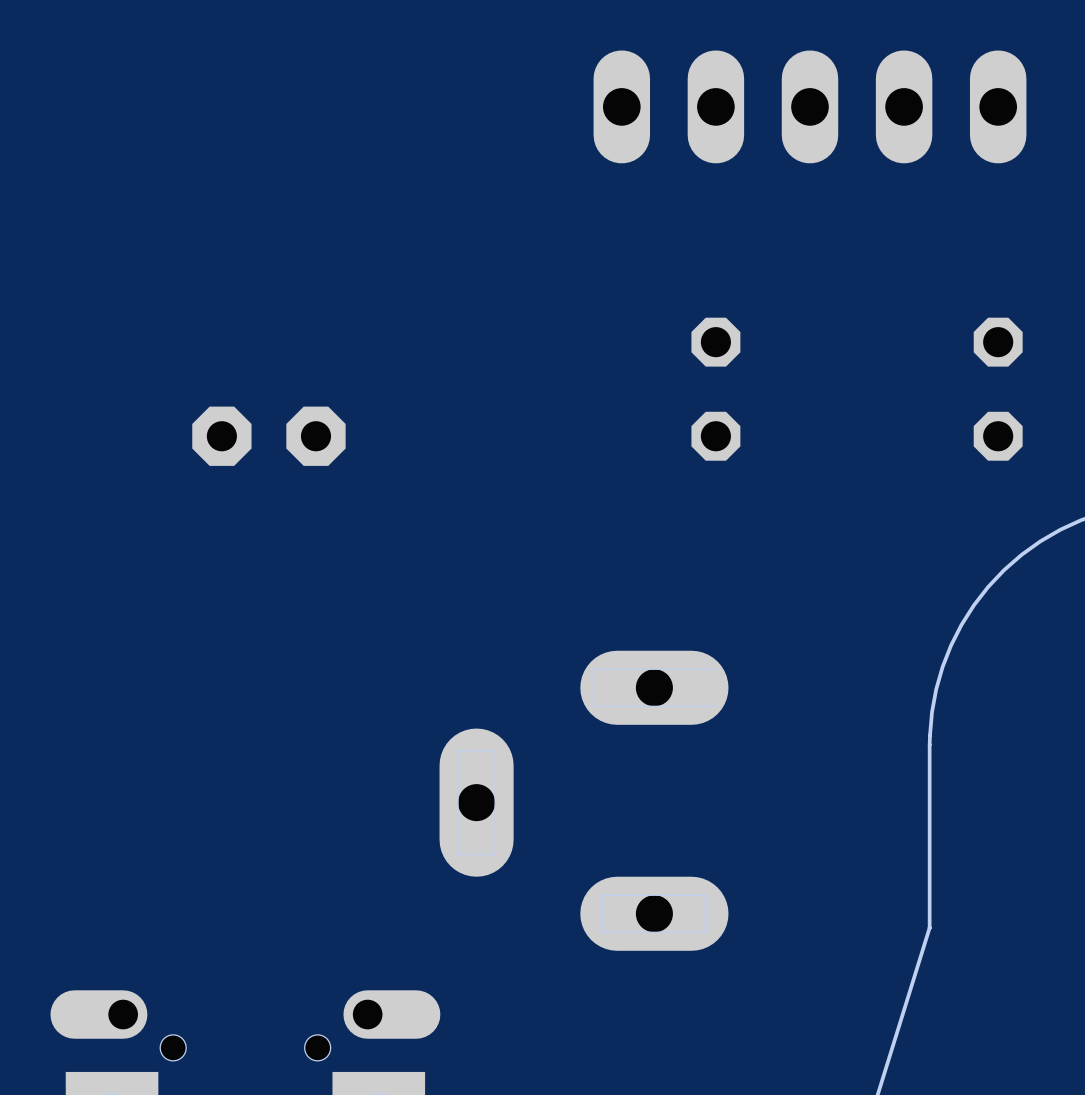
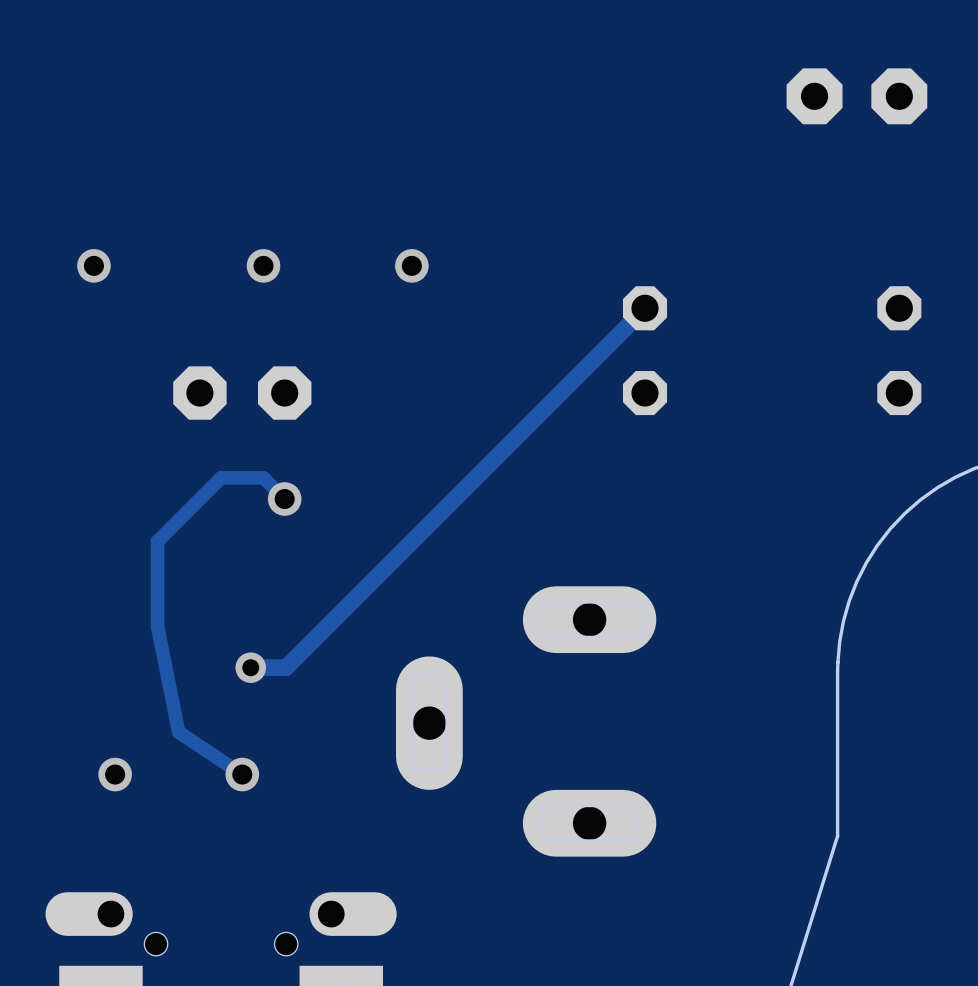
part: (809, 106) -> none
part: none -> (856, 96)
via: none -> (93, 265)
via: none -> (263, 265)
via: none -> (411, 265)
track: none -> (645, 308) (285, 667) (250, 667)
track: none -> (284, 499) (263, 477) (221, 477) (157, 541) (157, 626) (178, 732) (242, 774)
via: none -> (284, 499)
via: none -> (250, 667)
via: none -> (115, 774)
via: none -> (242, 774)

